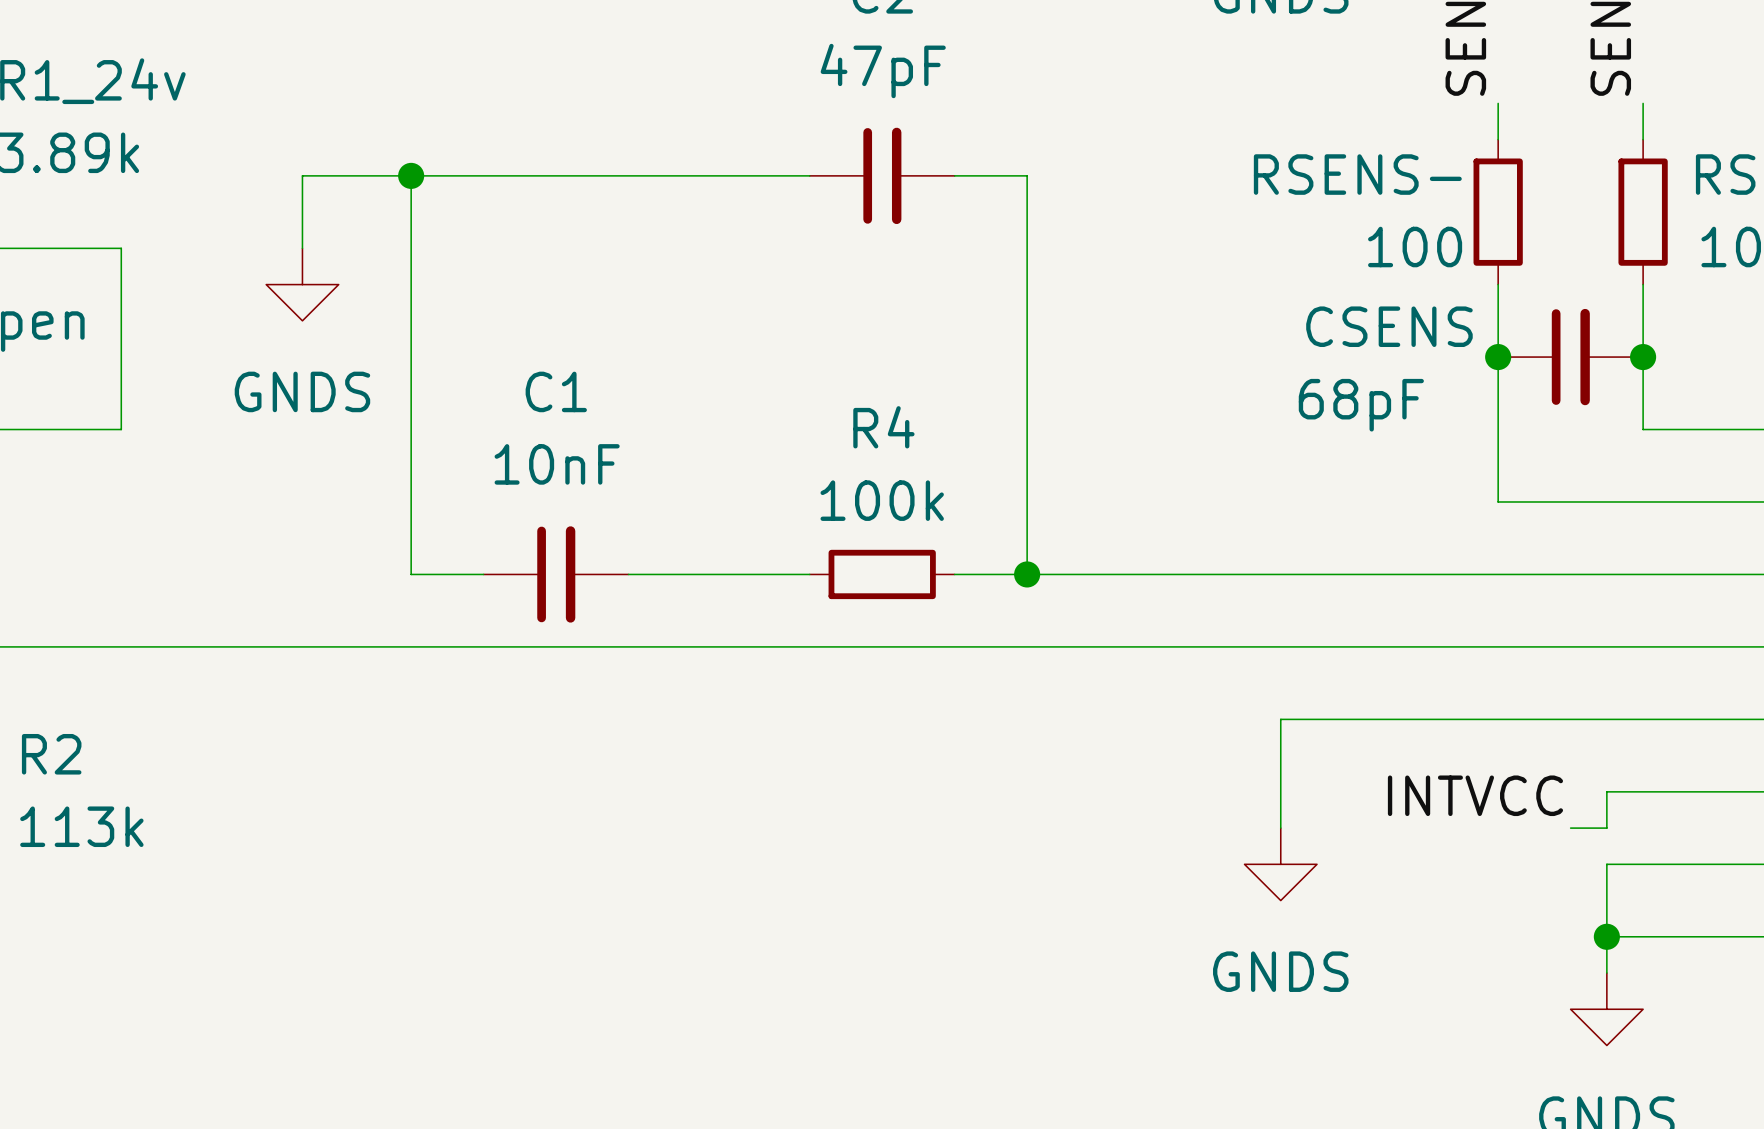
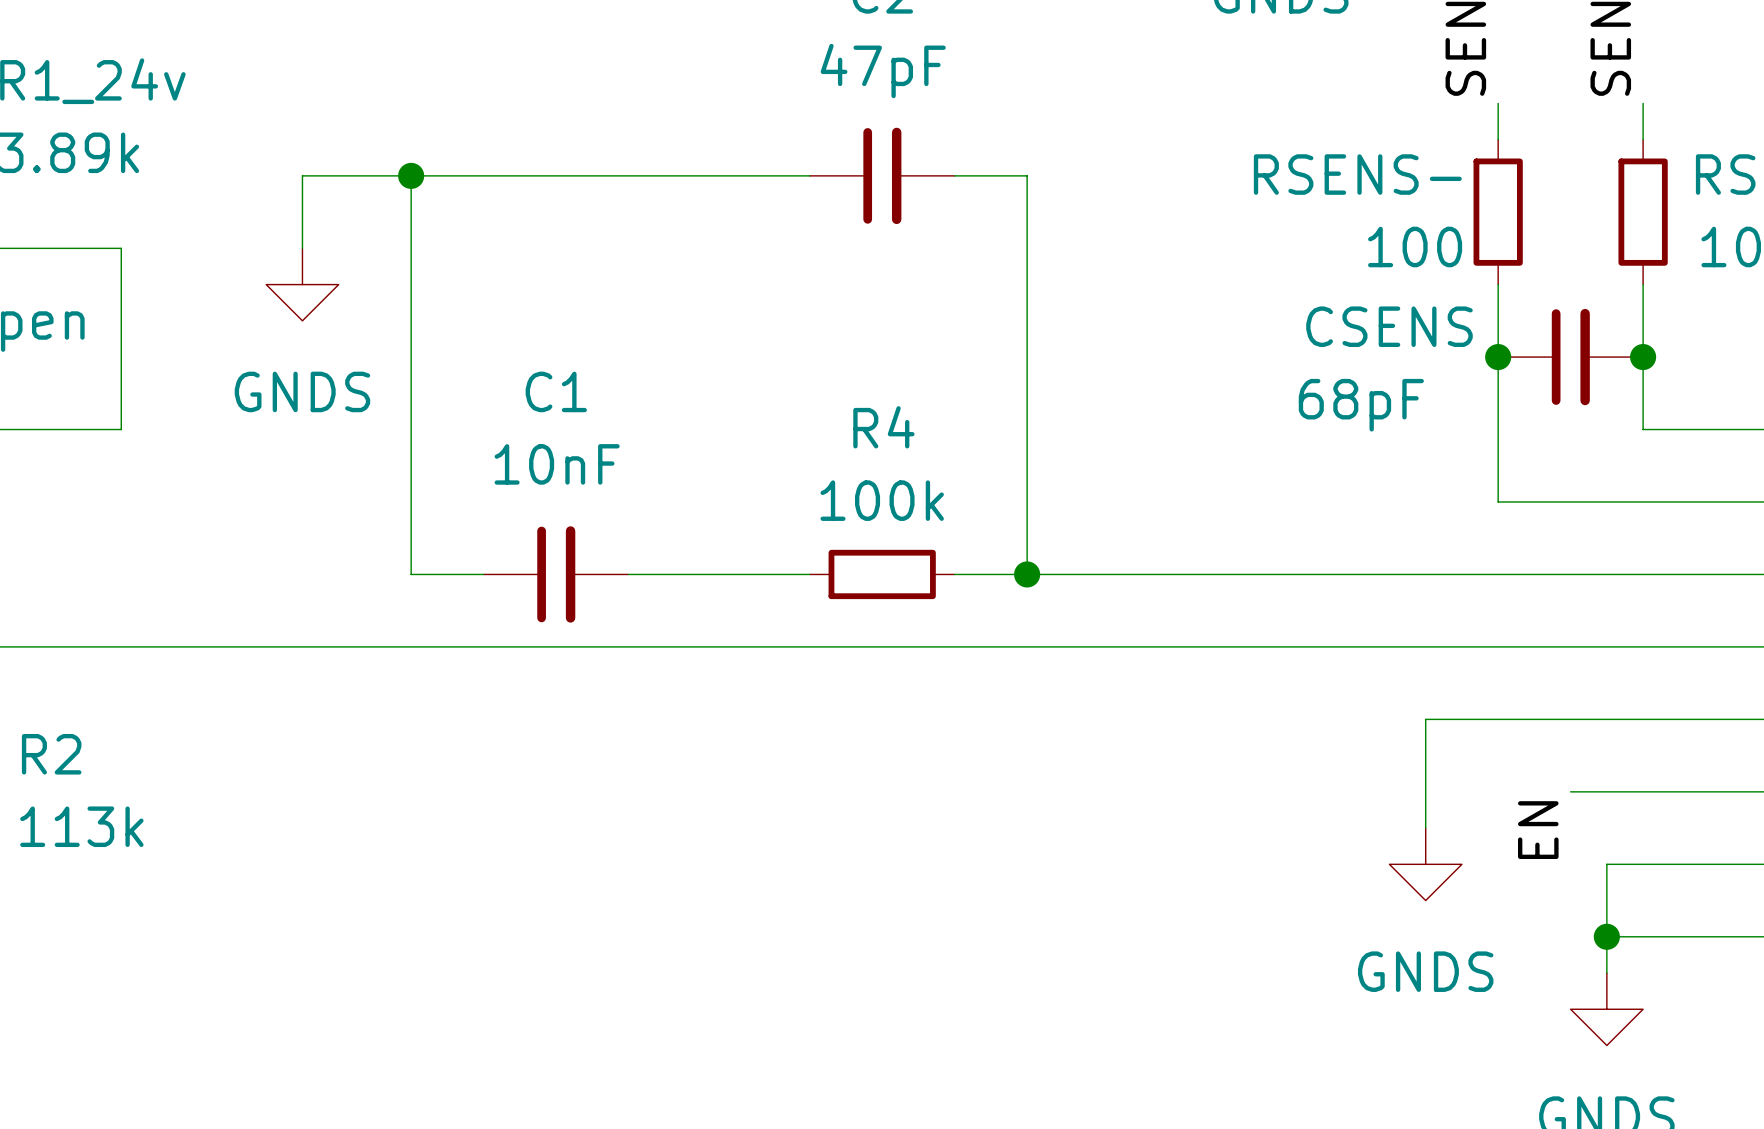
wire: (1425, 719) (1280, 719) (1280, 828) -> (1425, 719) (1425, 828)
wire: (1606, 791) (1606, 828) (1570, 828) -> (1606, 791) (1570, 791)
label: INTVCC (1475, 795) -> EN (1538, 830)
power symbol position: GNDS (1280, 864) -> GNDS (1425, 864)

